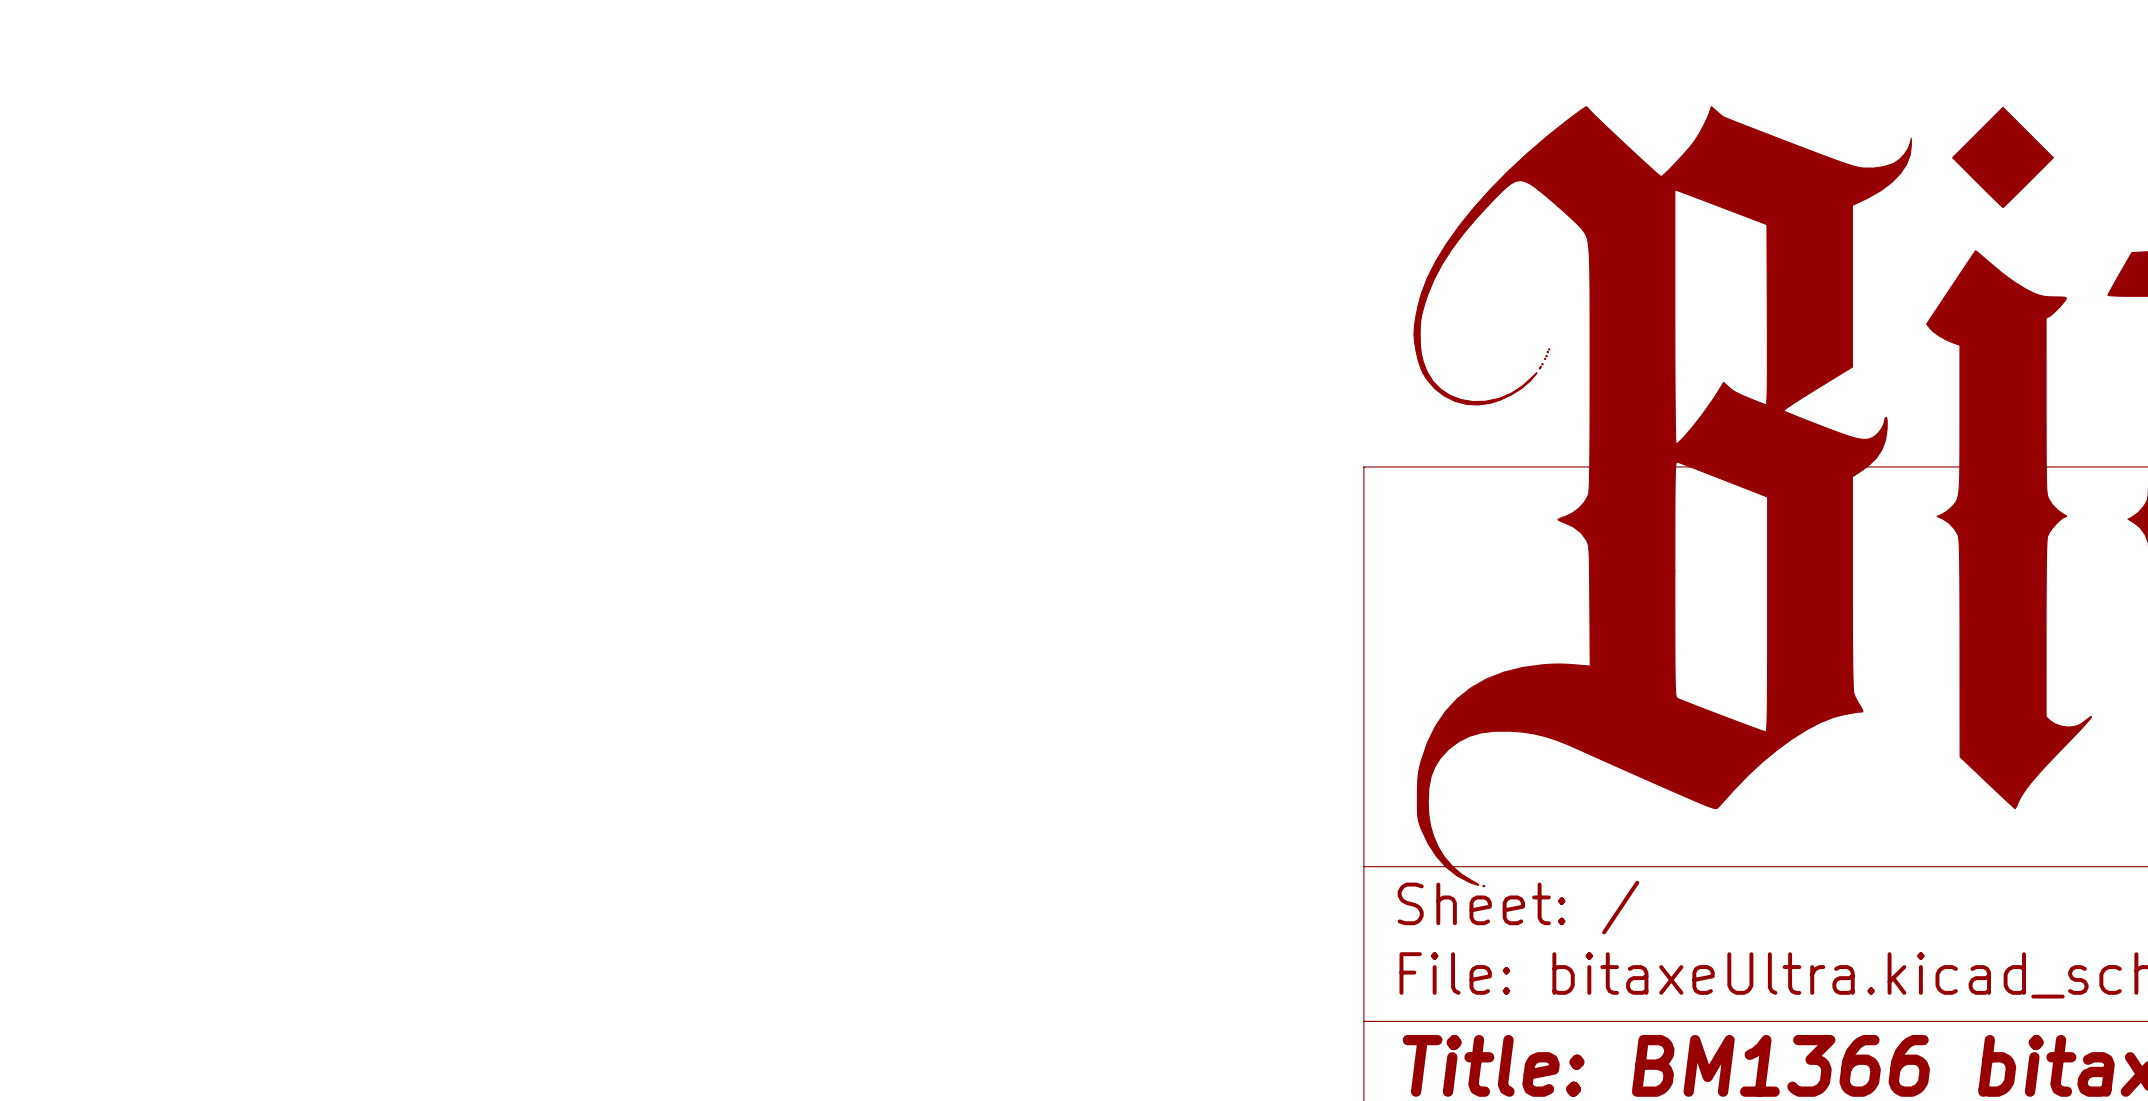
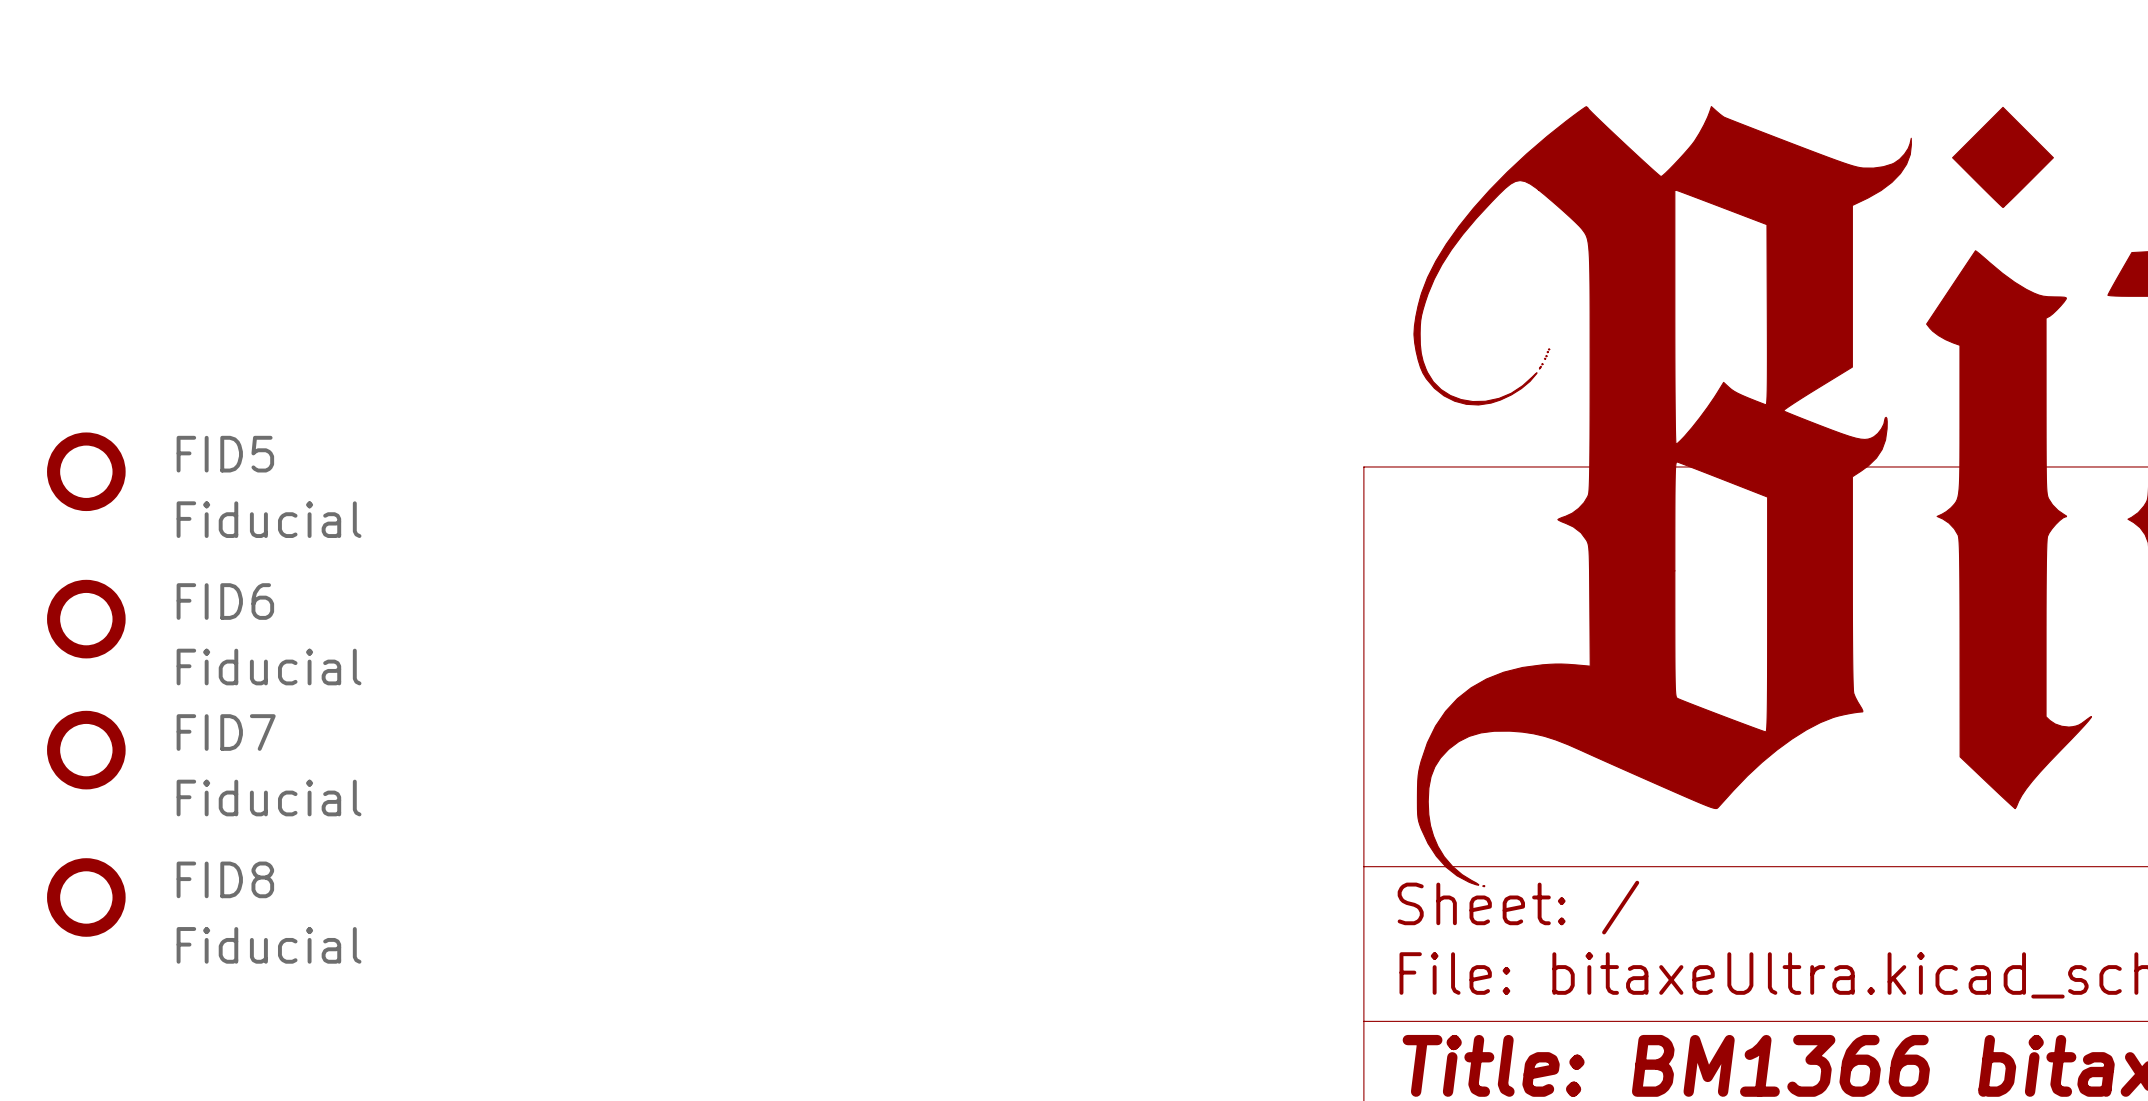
FID5: none -> Fiducial (86, 471)
FID6: none -> Fiducial (86, 619)
FID7: none -> Fiducial (86, 750)
FID8: none -> Fiducial (86, 897)

